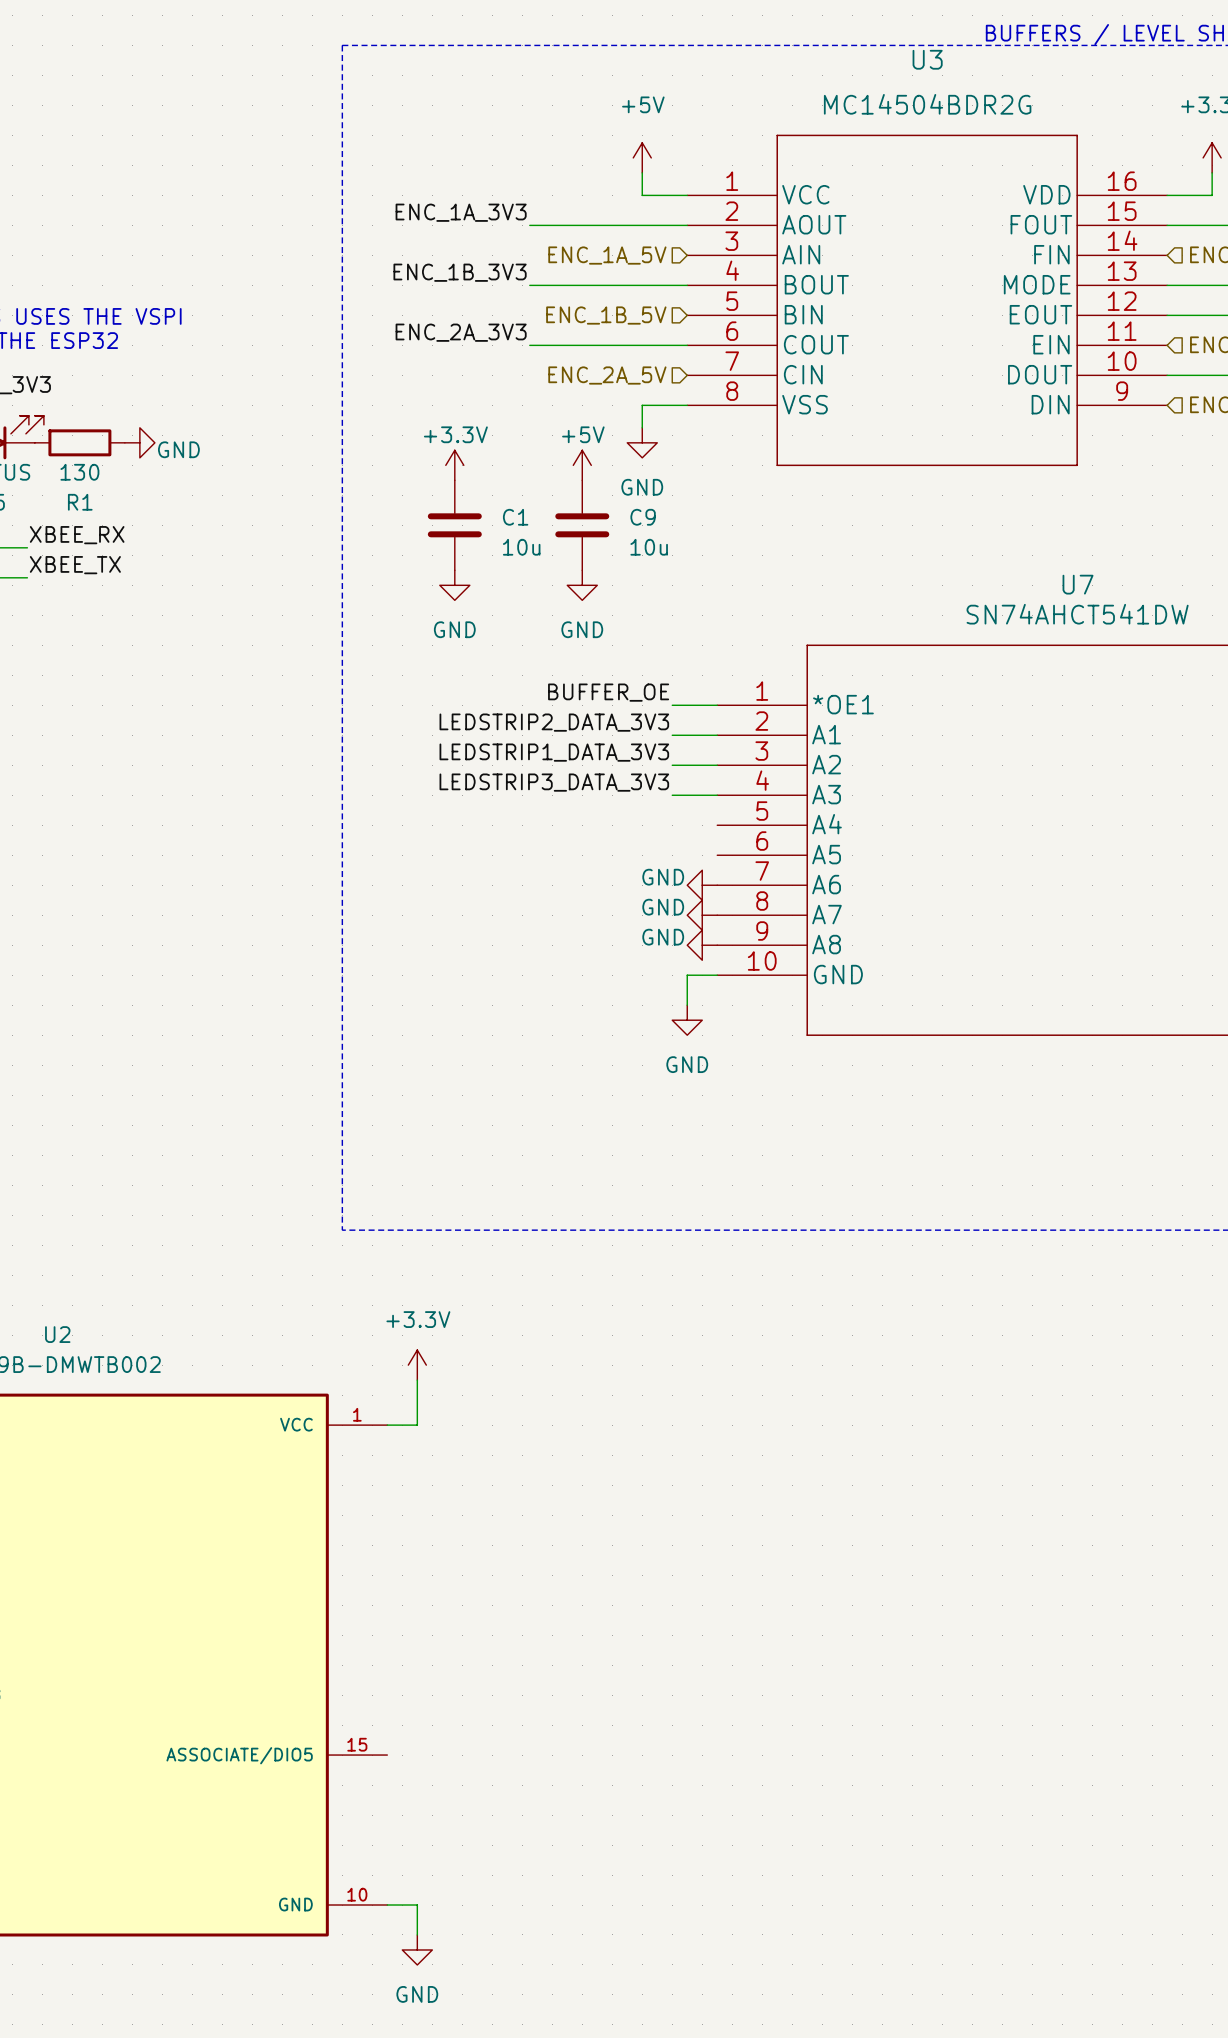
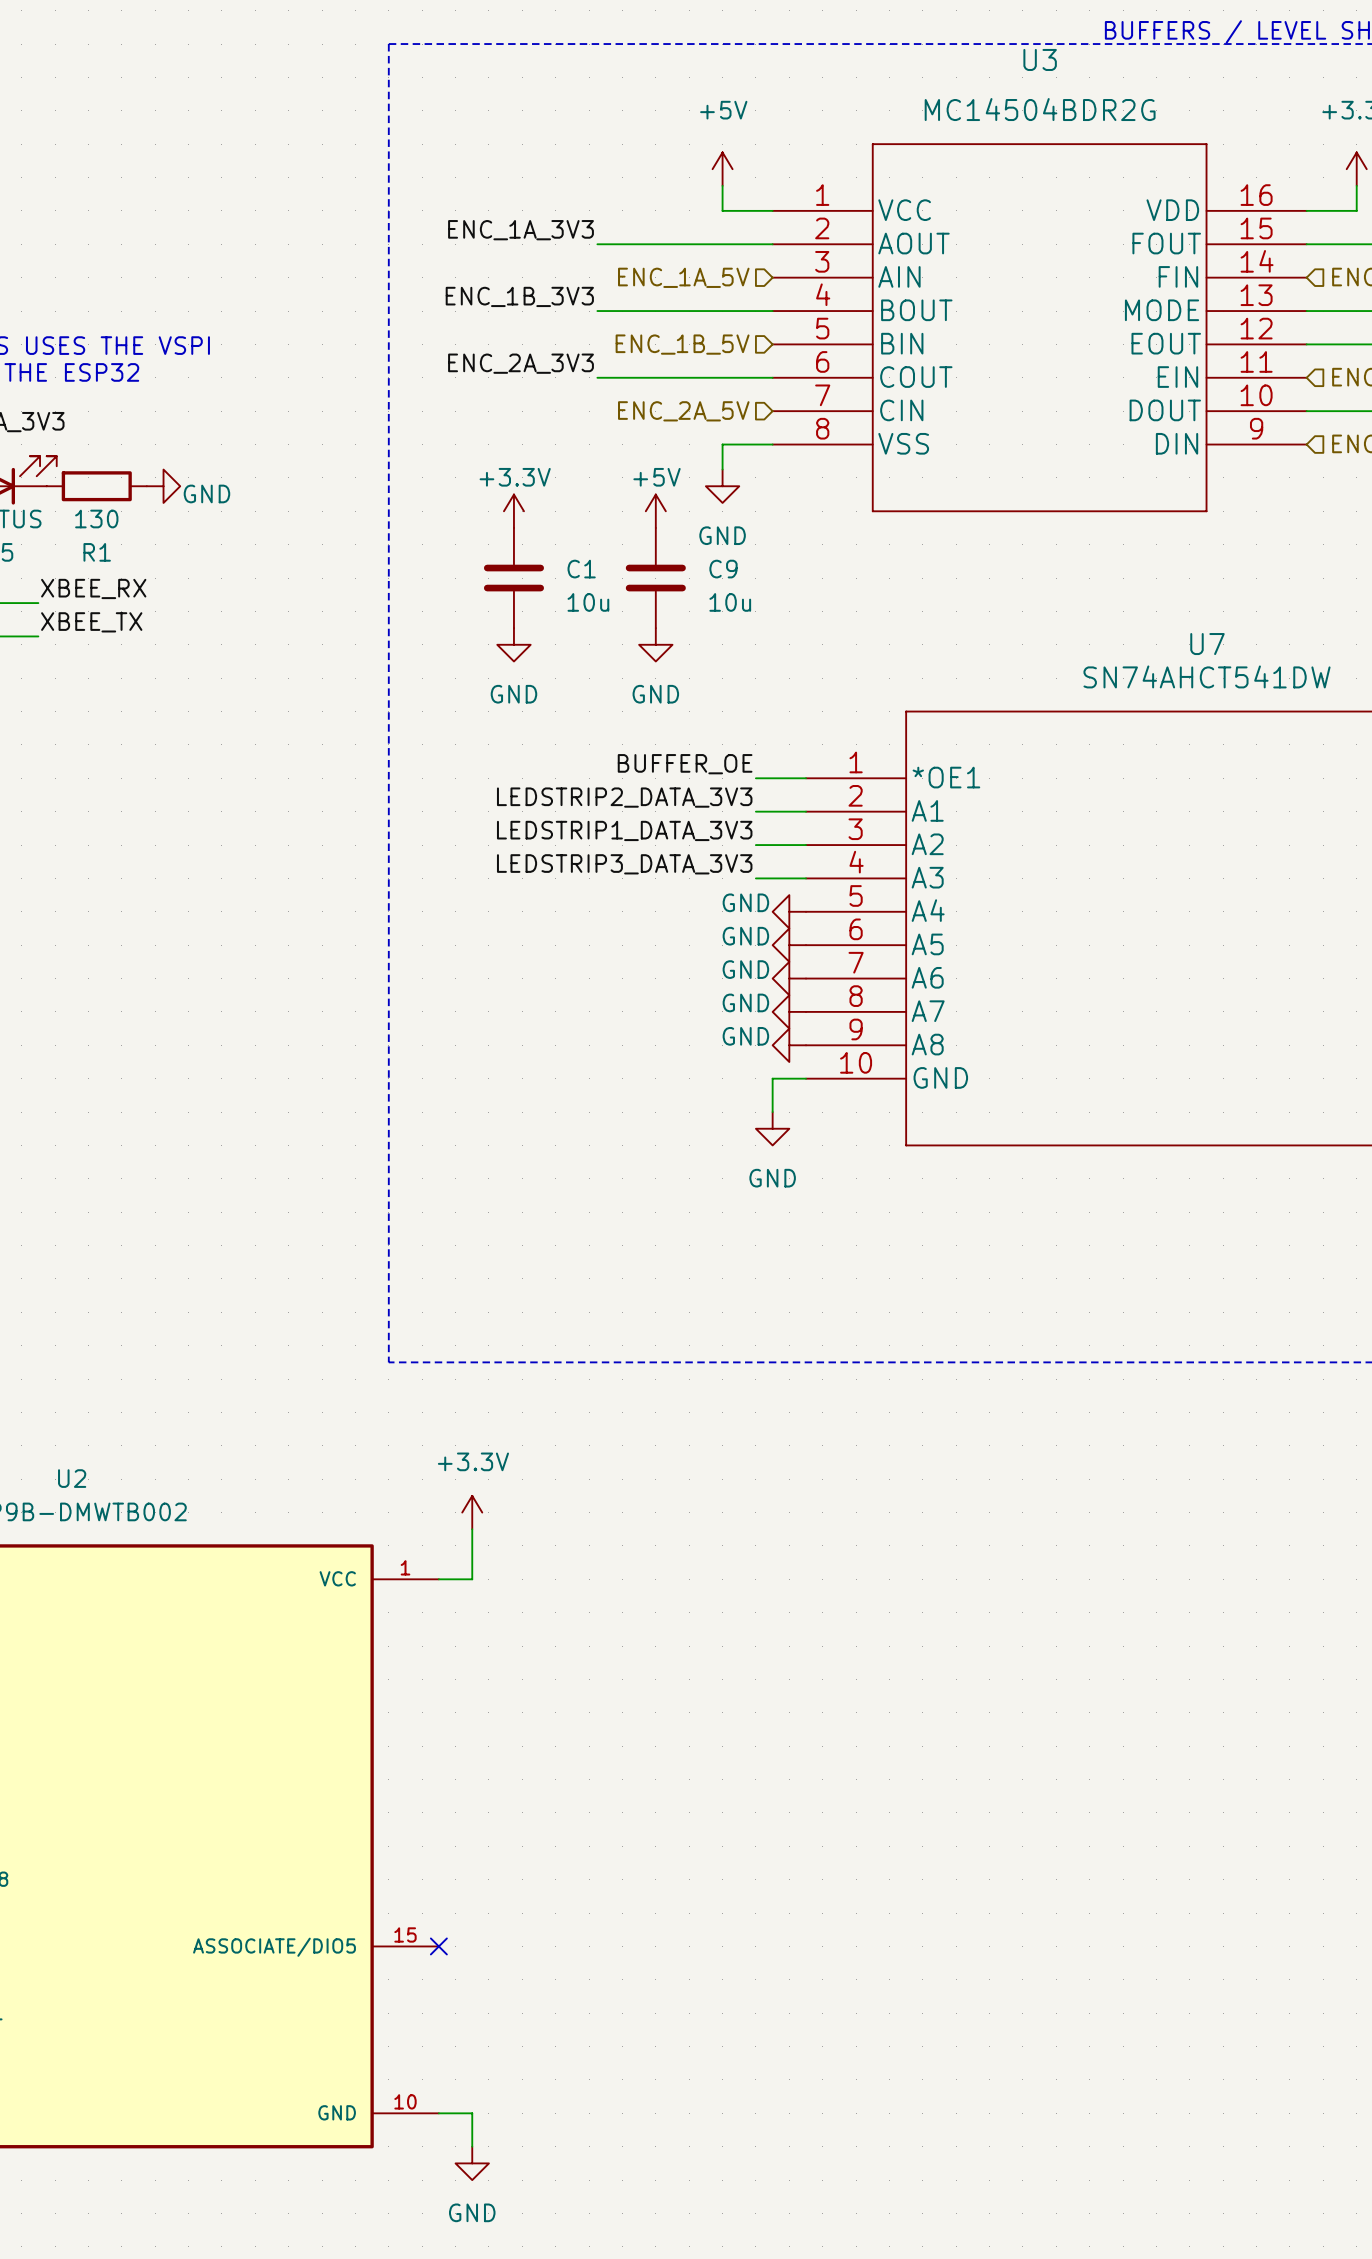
power symbol: none -> GND (789, 911)
power symbol: none -> GND (789, 945)
no-connect mark: none -> (438, 1946)

